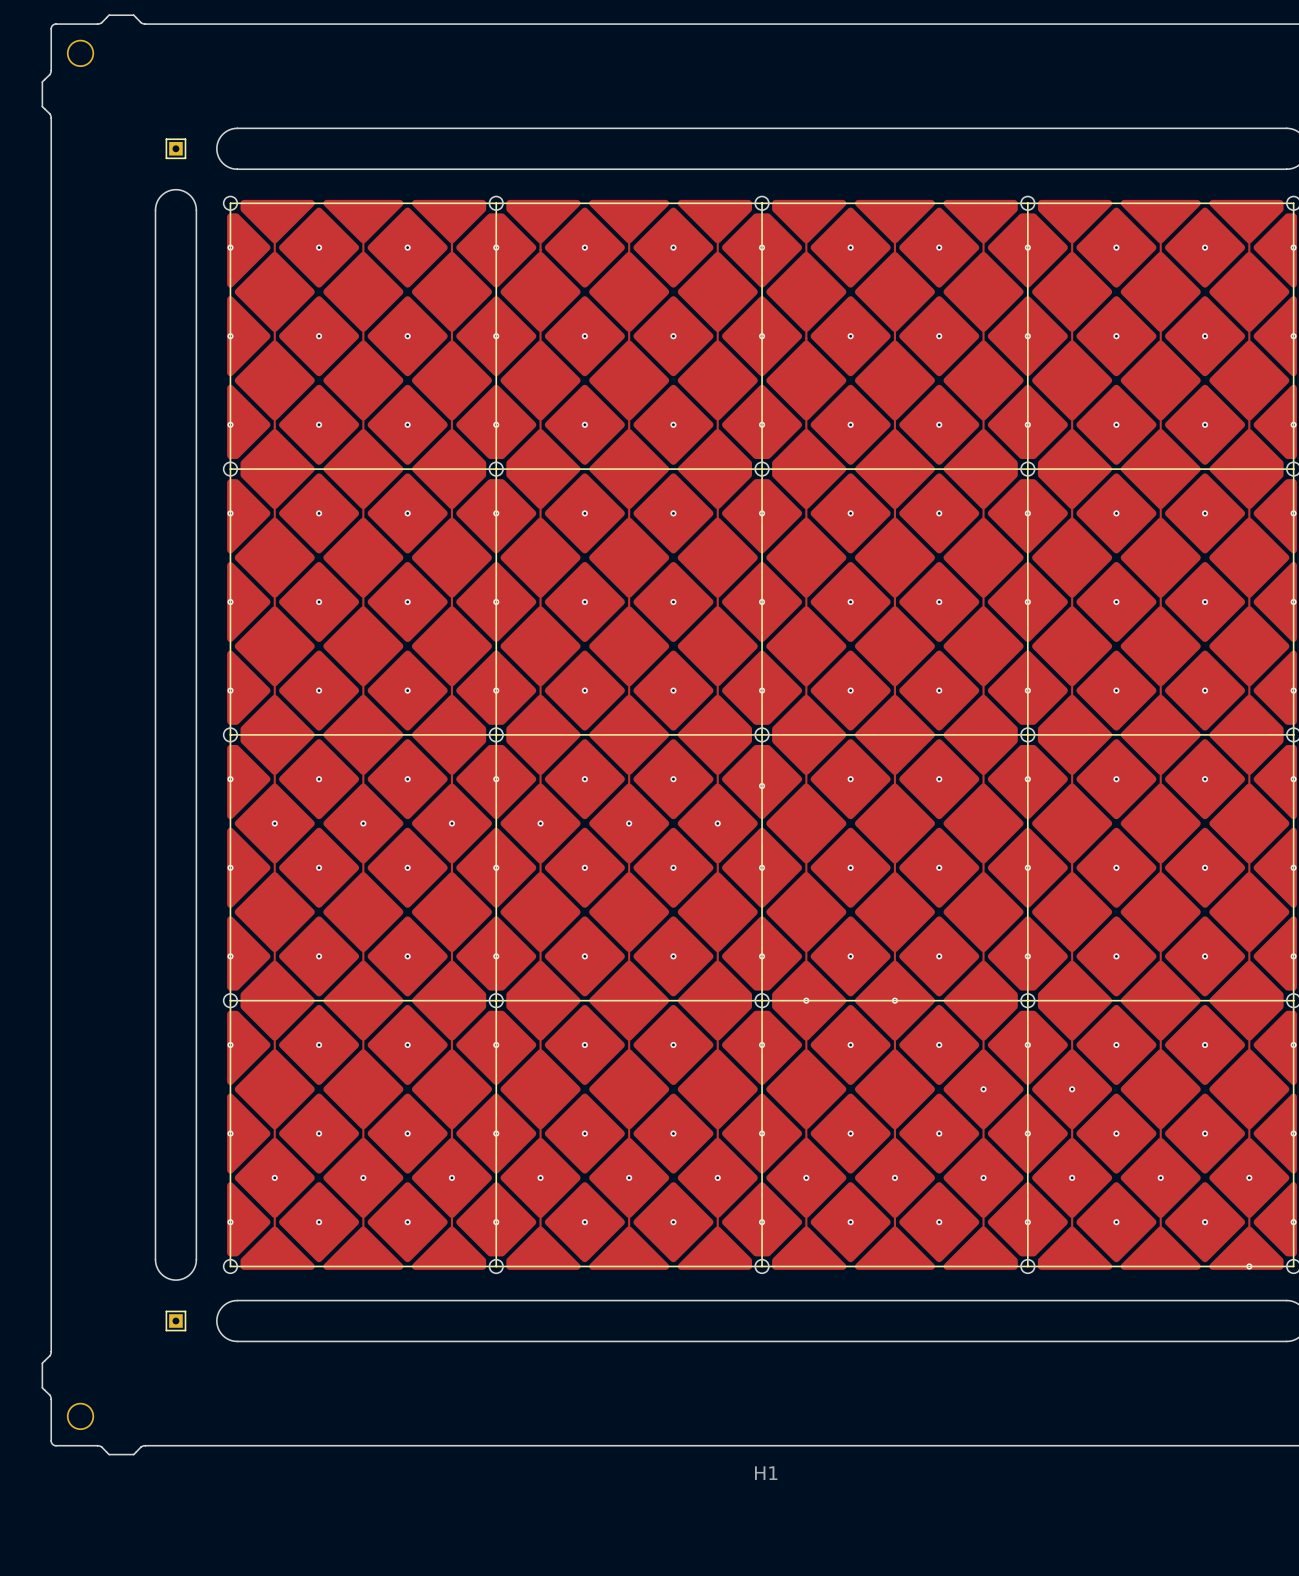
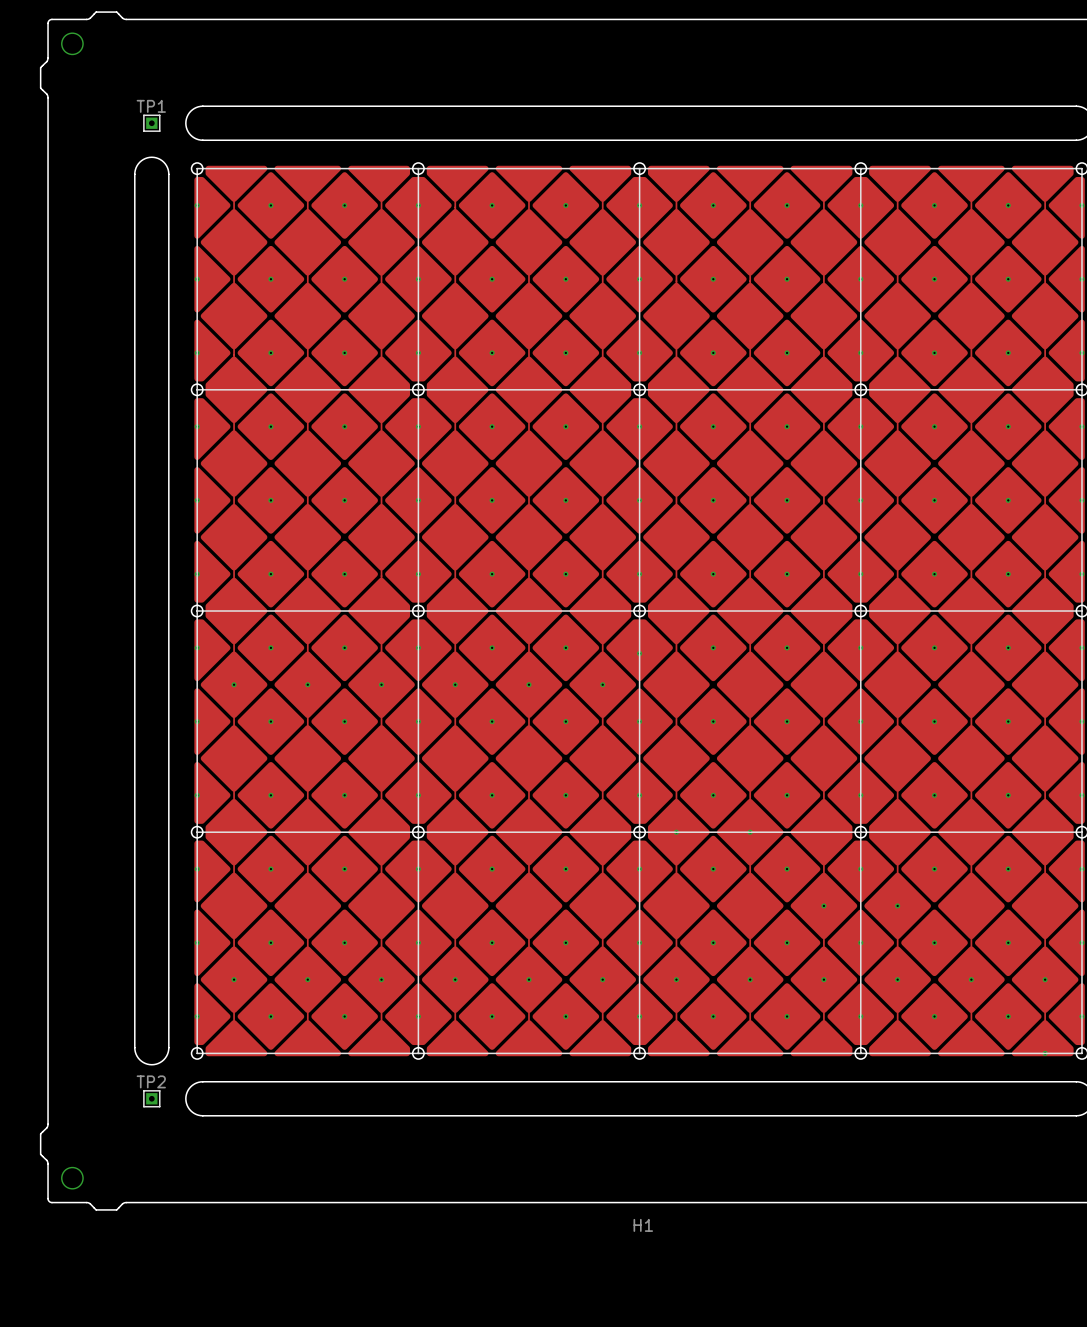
TP1 name: none -> TP1 (151, 106)
TP2 name: none -> TP2 (151, 1081)

